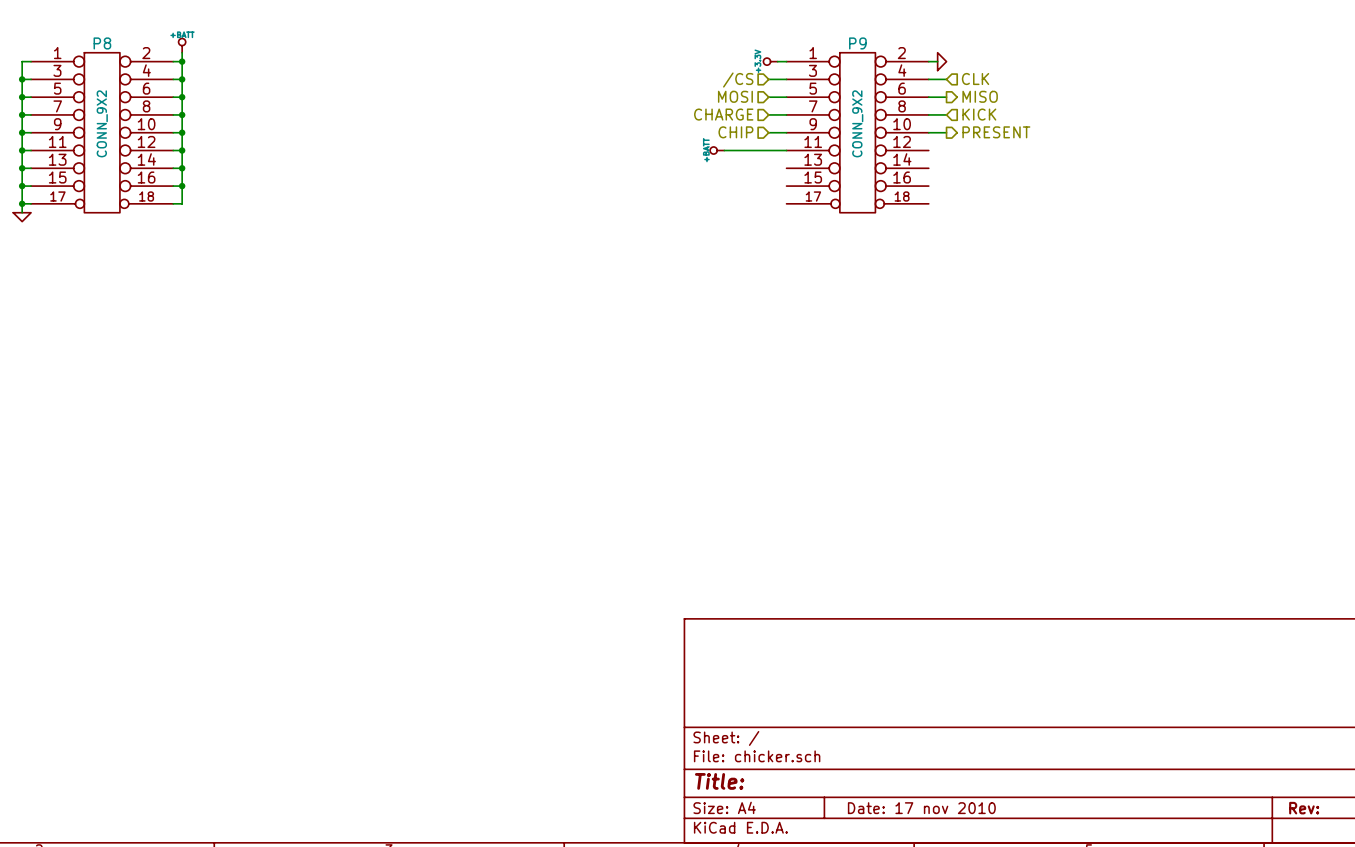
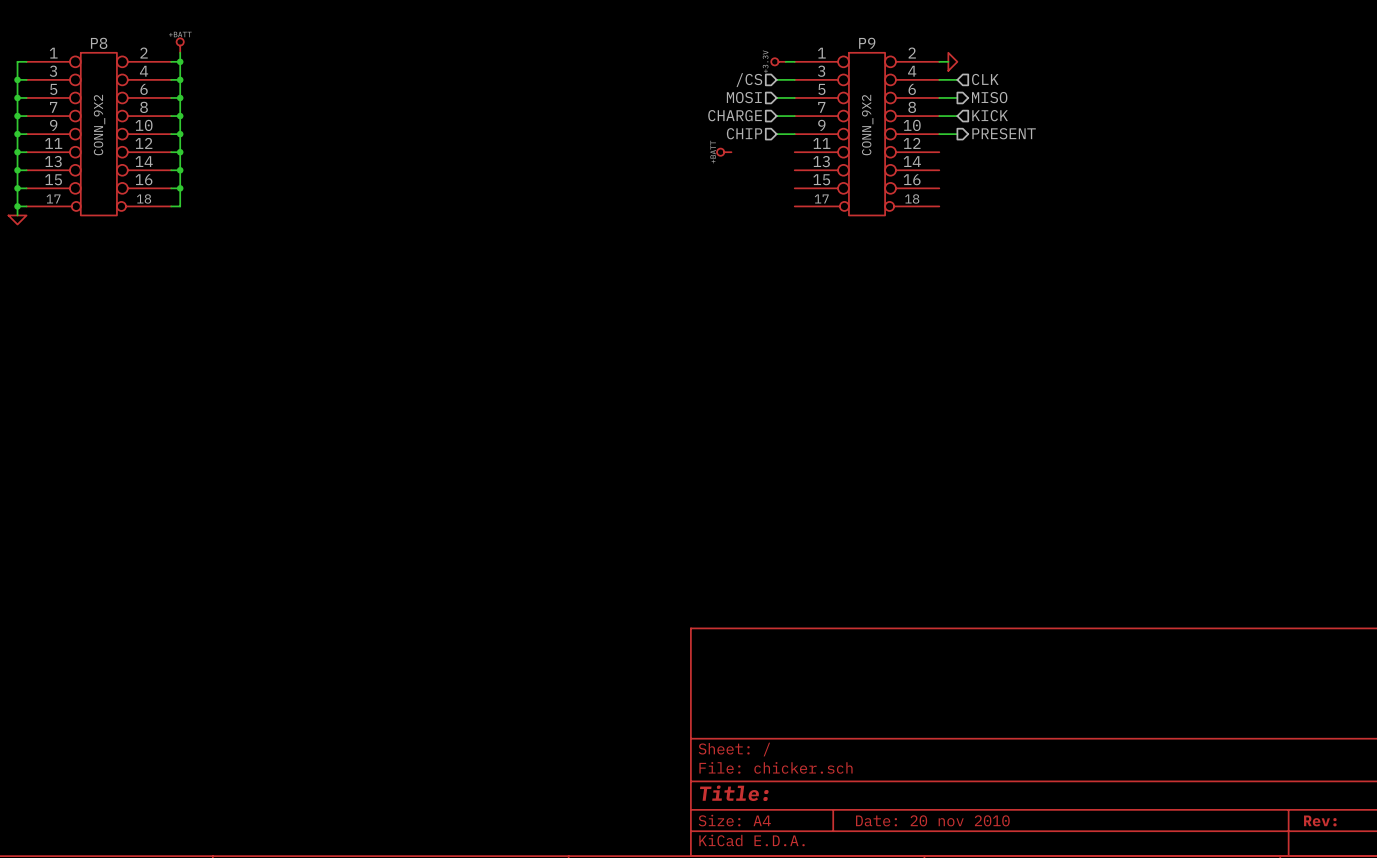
wire: (724, 150) (786, 150) -> none
title block: Date: 17 nov 2010 (921, 808) -> Date: 20 nov 2010 (932, 820)

